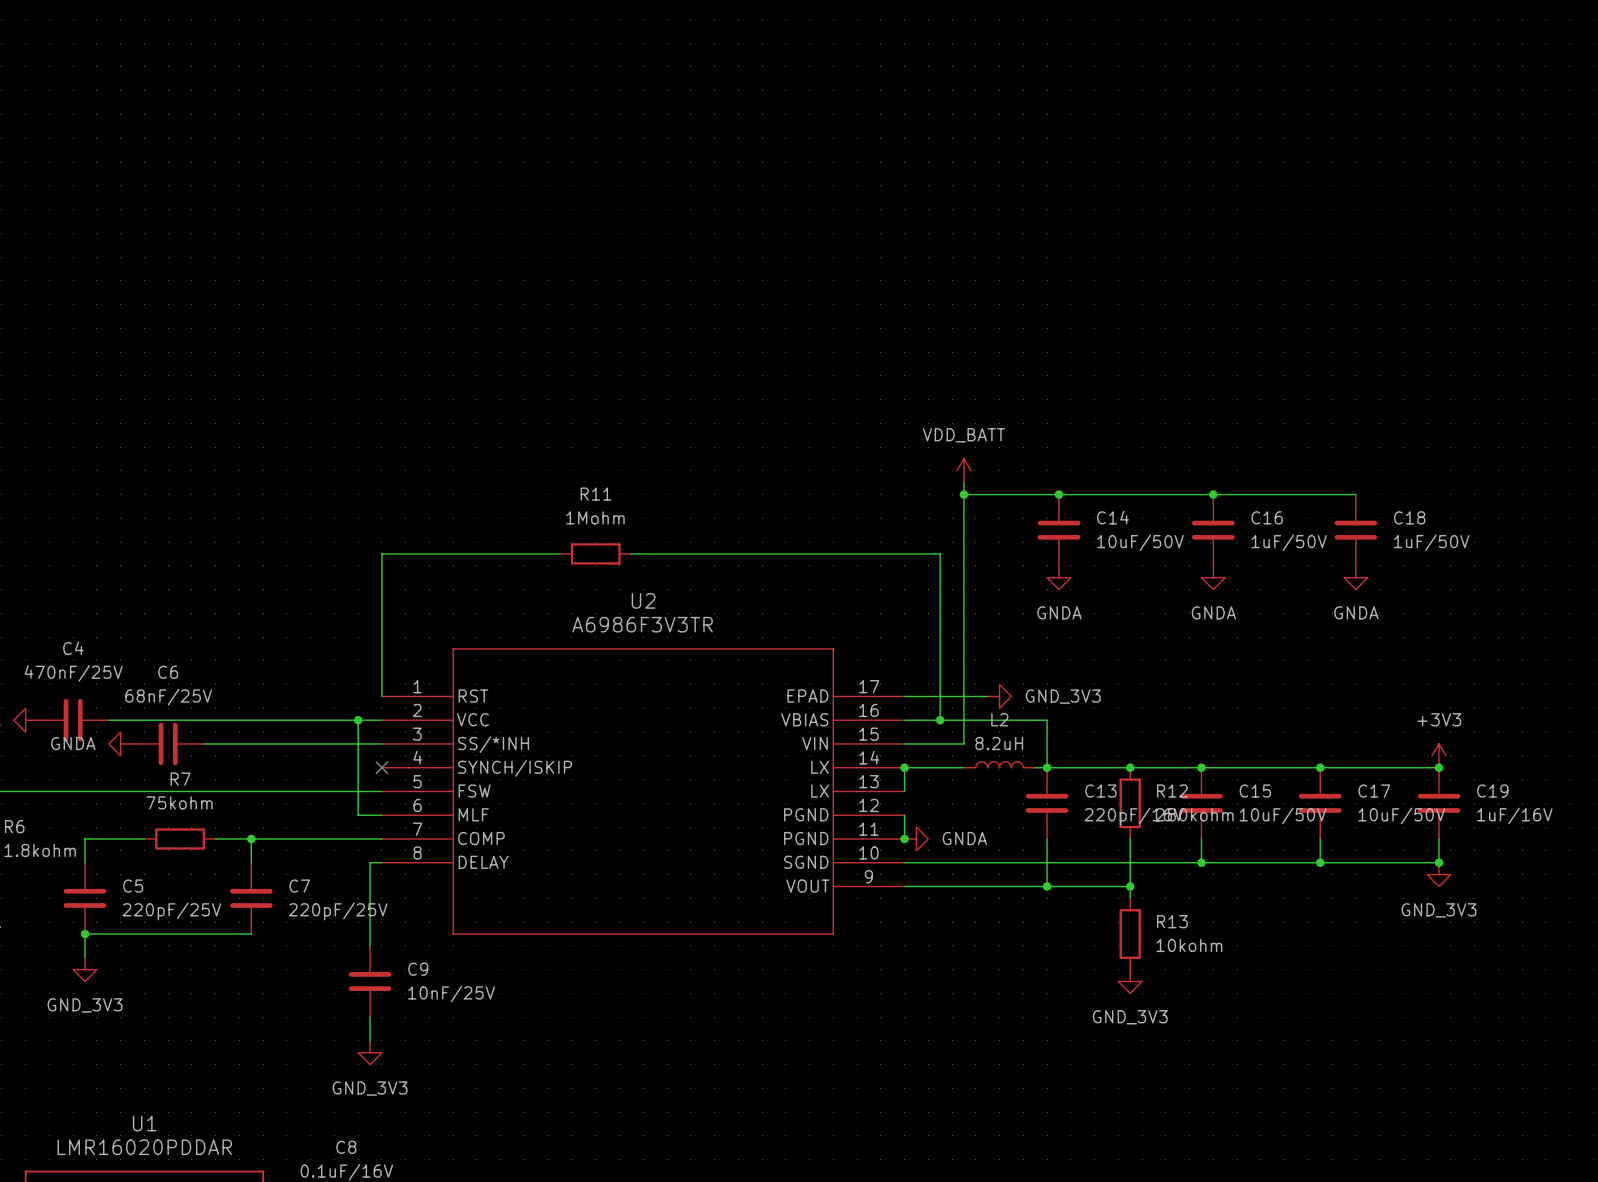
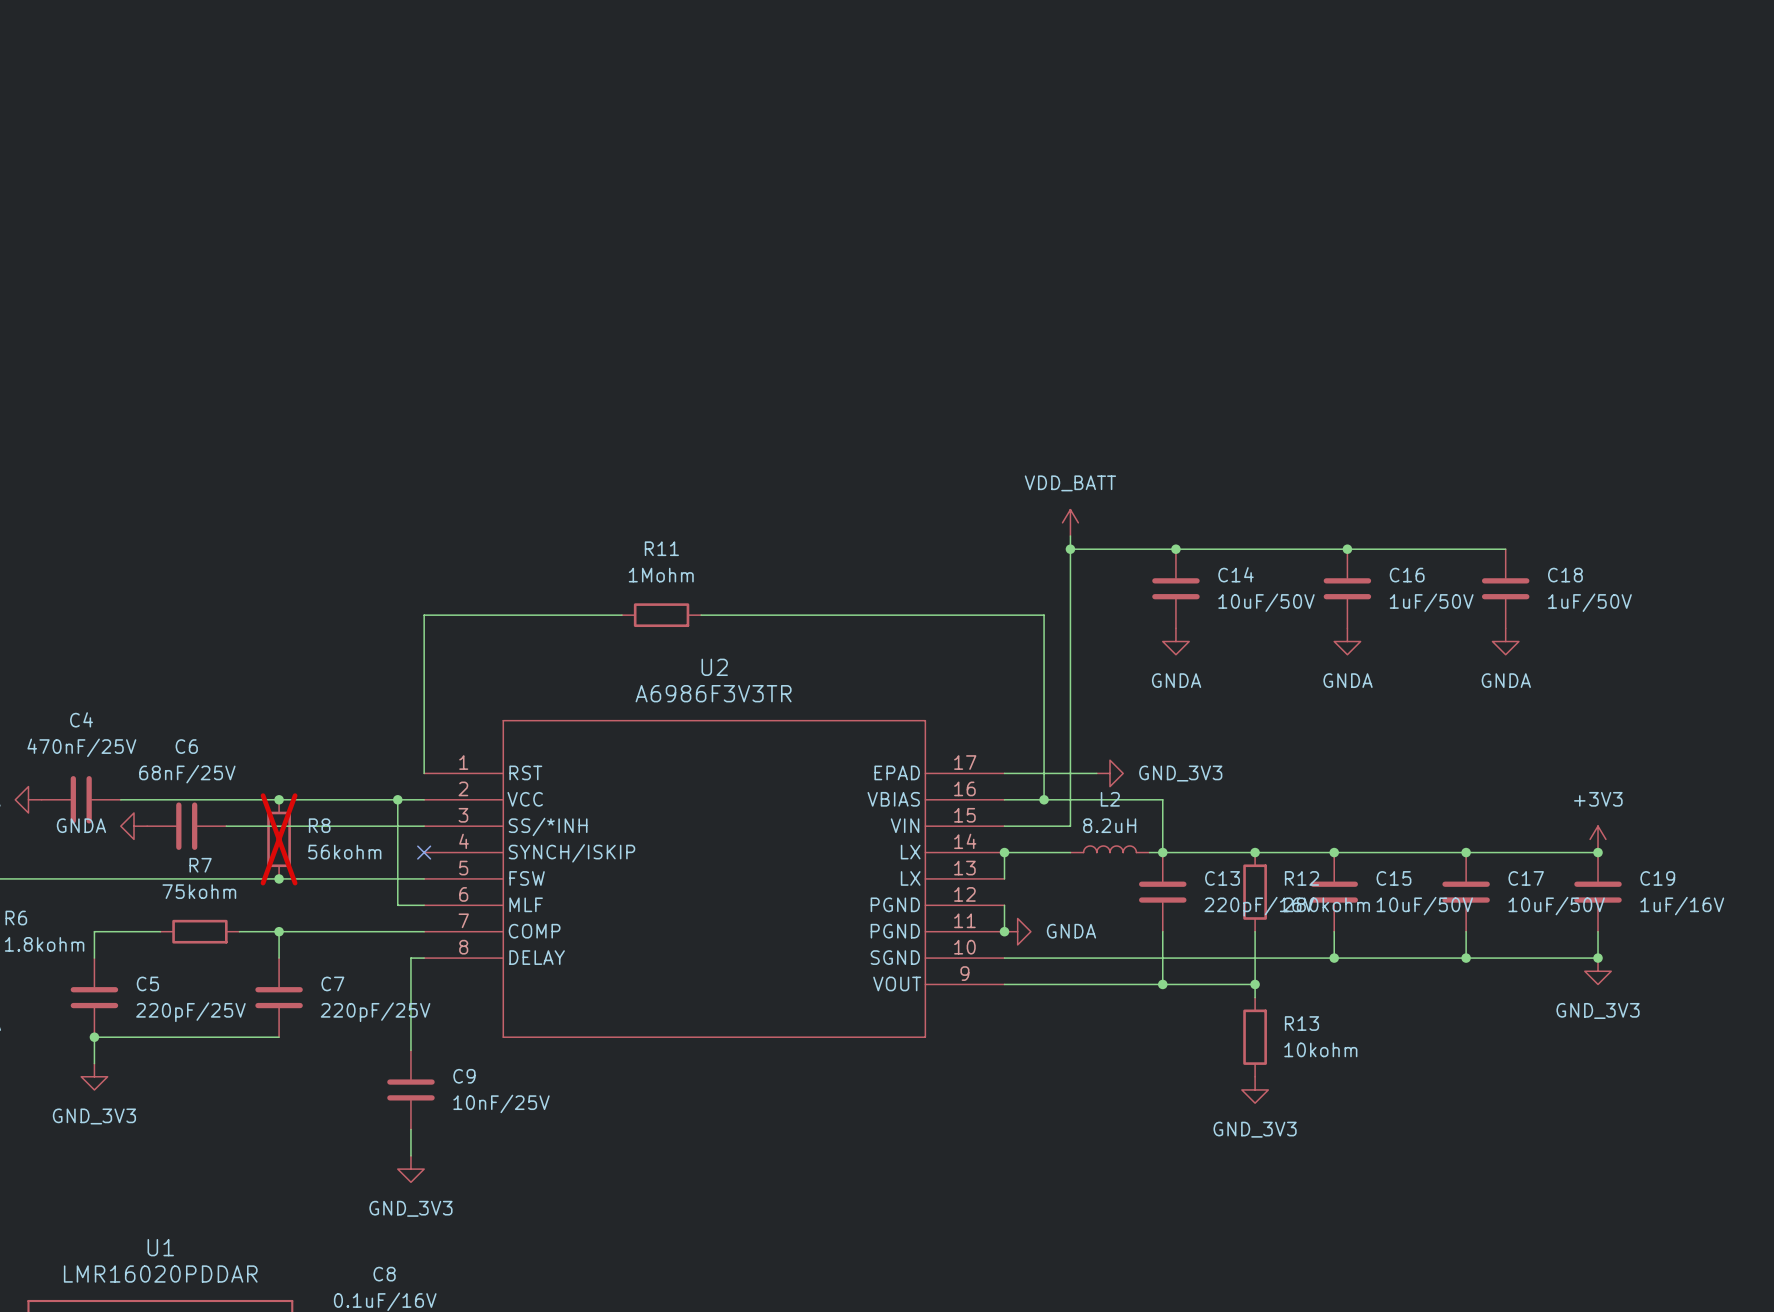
junction: none -> (279, 799)
R8: none -> 56kohm (279, 839)
junction: none -> (279, 878)

